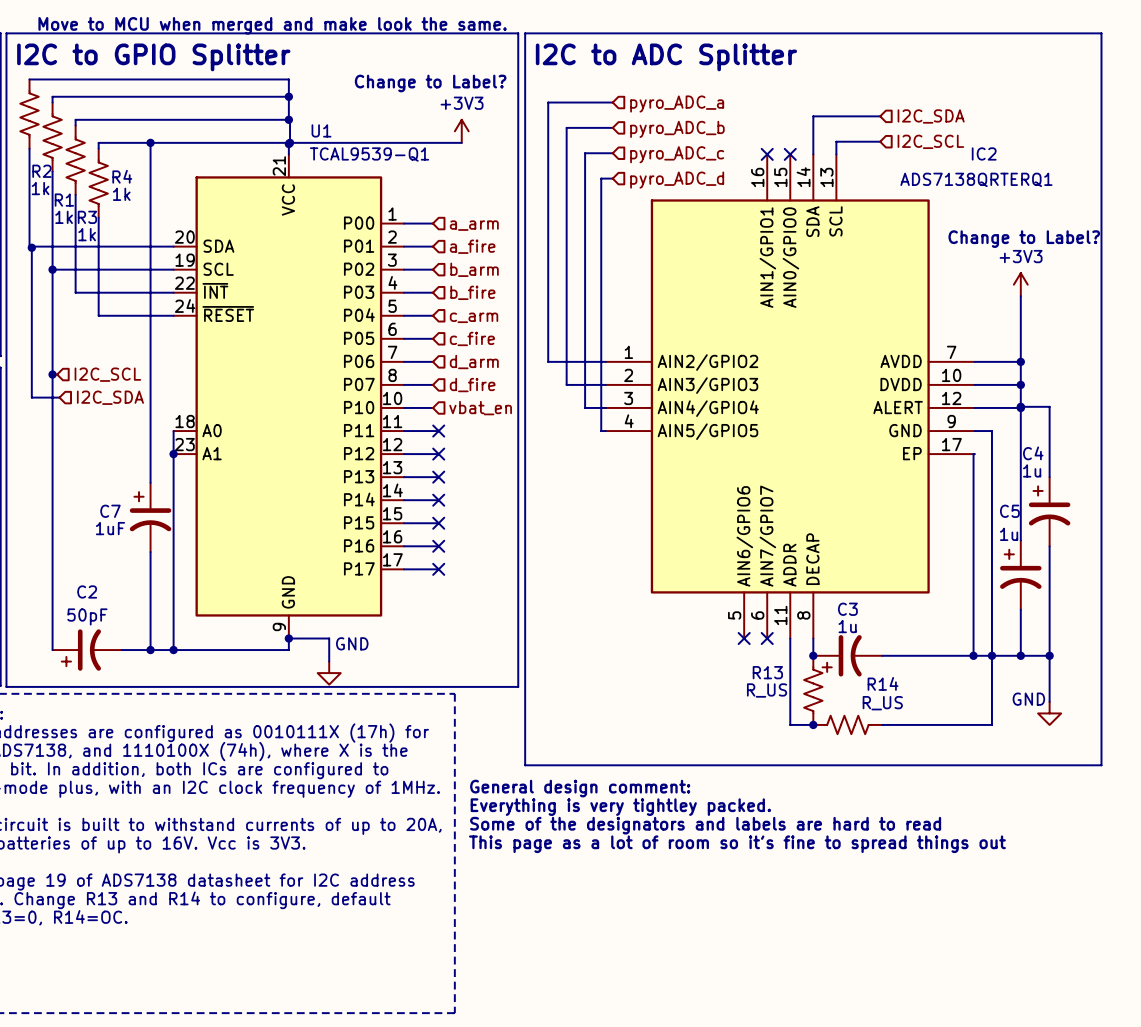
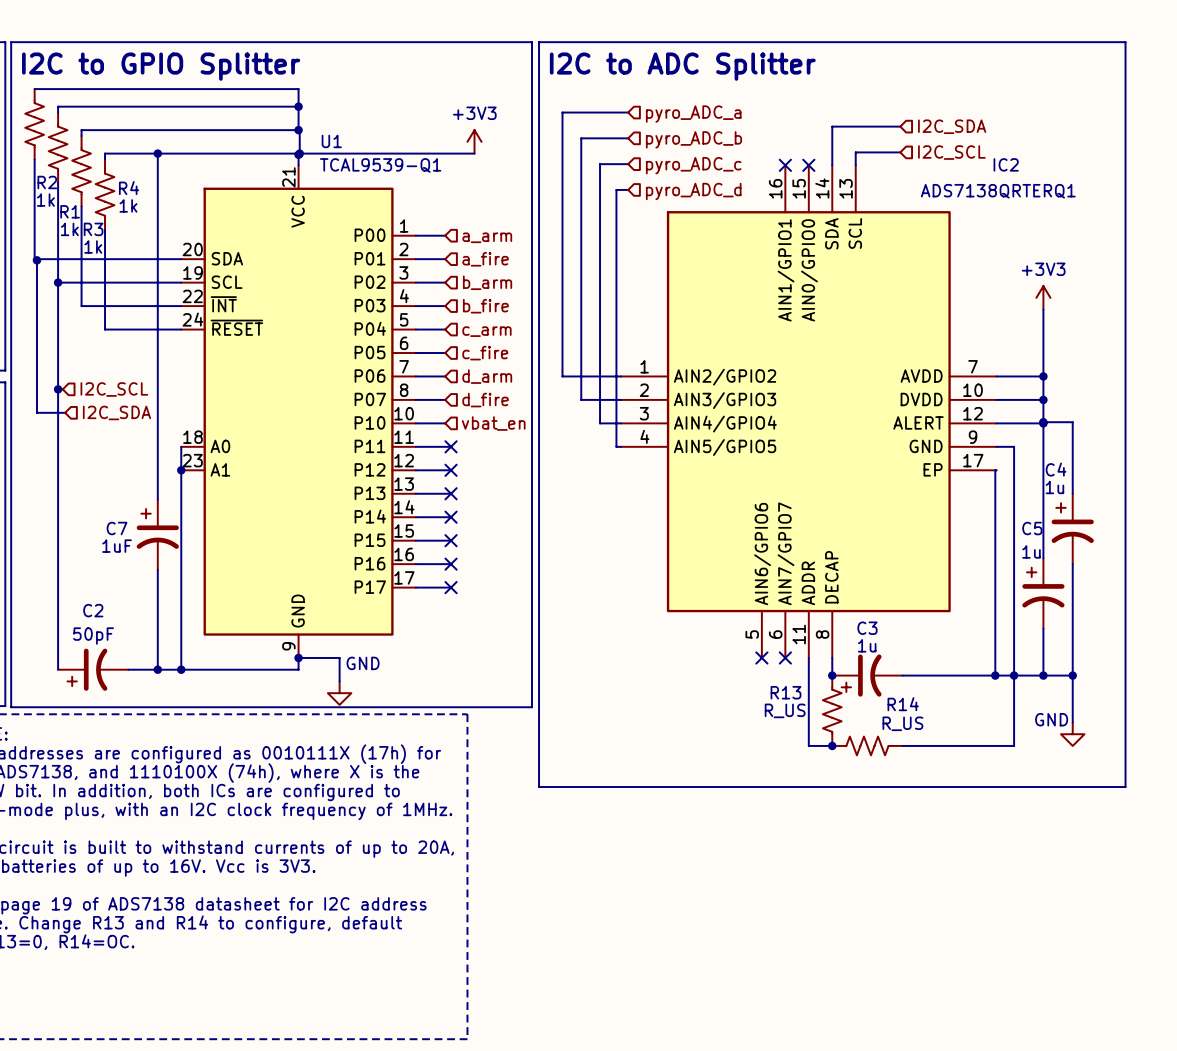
text: Move to MCU when merged and make look the same. (272, 25) -> none
text: Change to Label? (430, 83) -> none
text: Change to Label? (1024, 239) -> none
text: General design comment: (580, 788) -> none
text: Everything is very tightley packed. (620, 807) -> none
text: Some of the designators and labels are hard to read (705, 825) -> none
text: This page as a lot of room so it's fine to spread things out (737, 844) -> none

